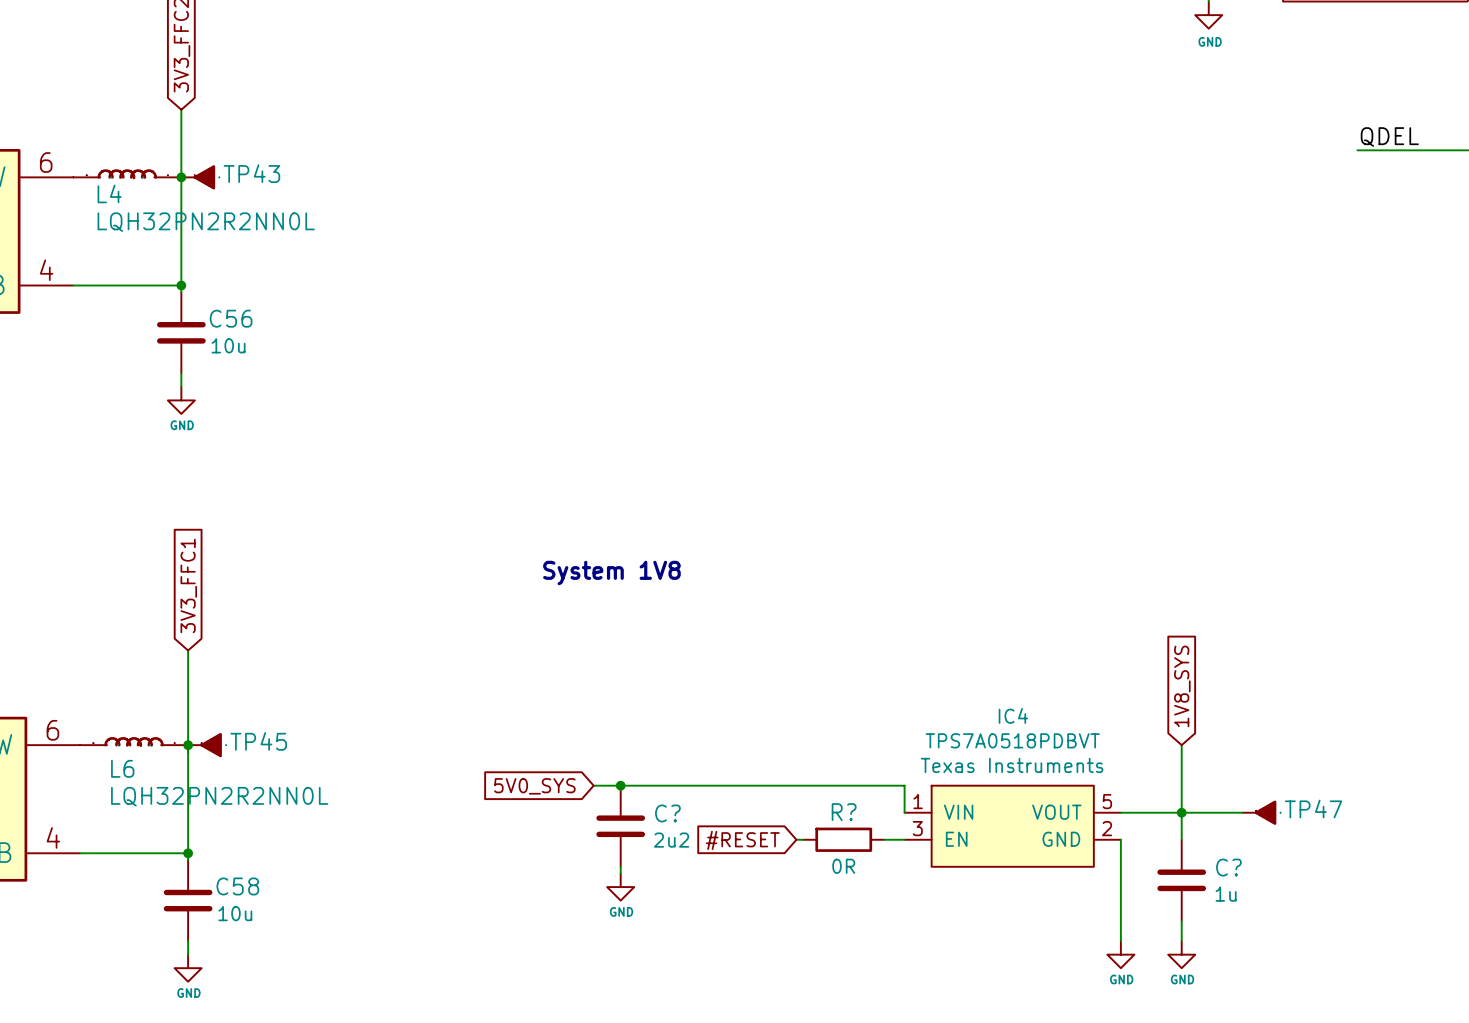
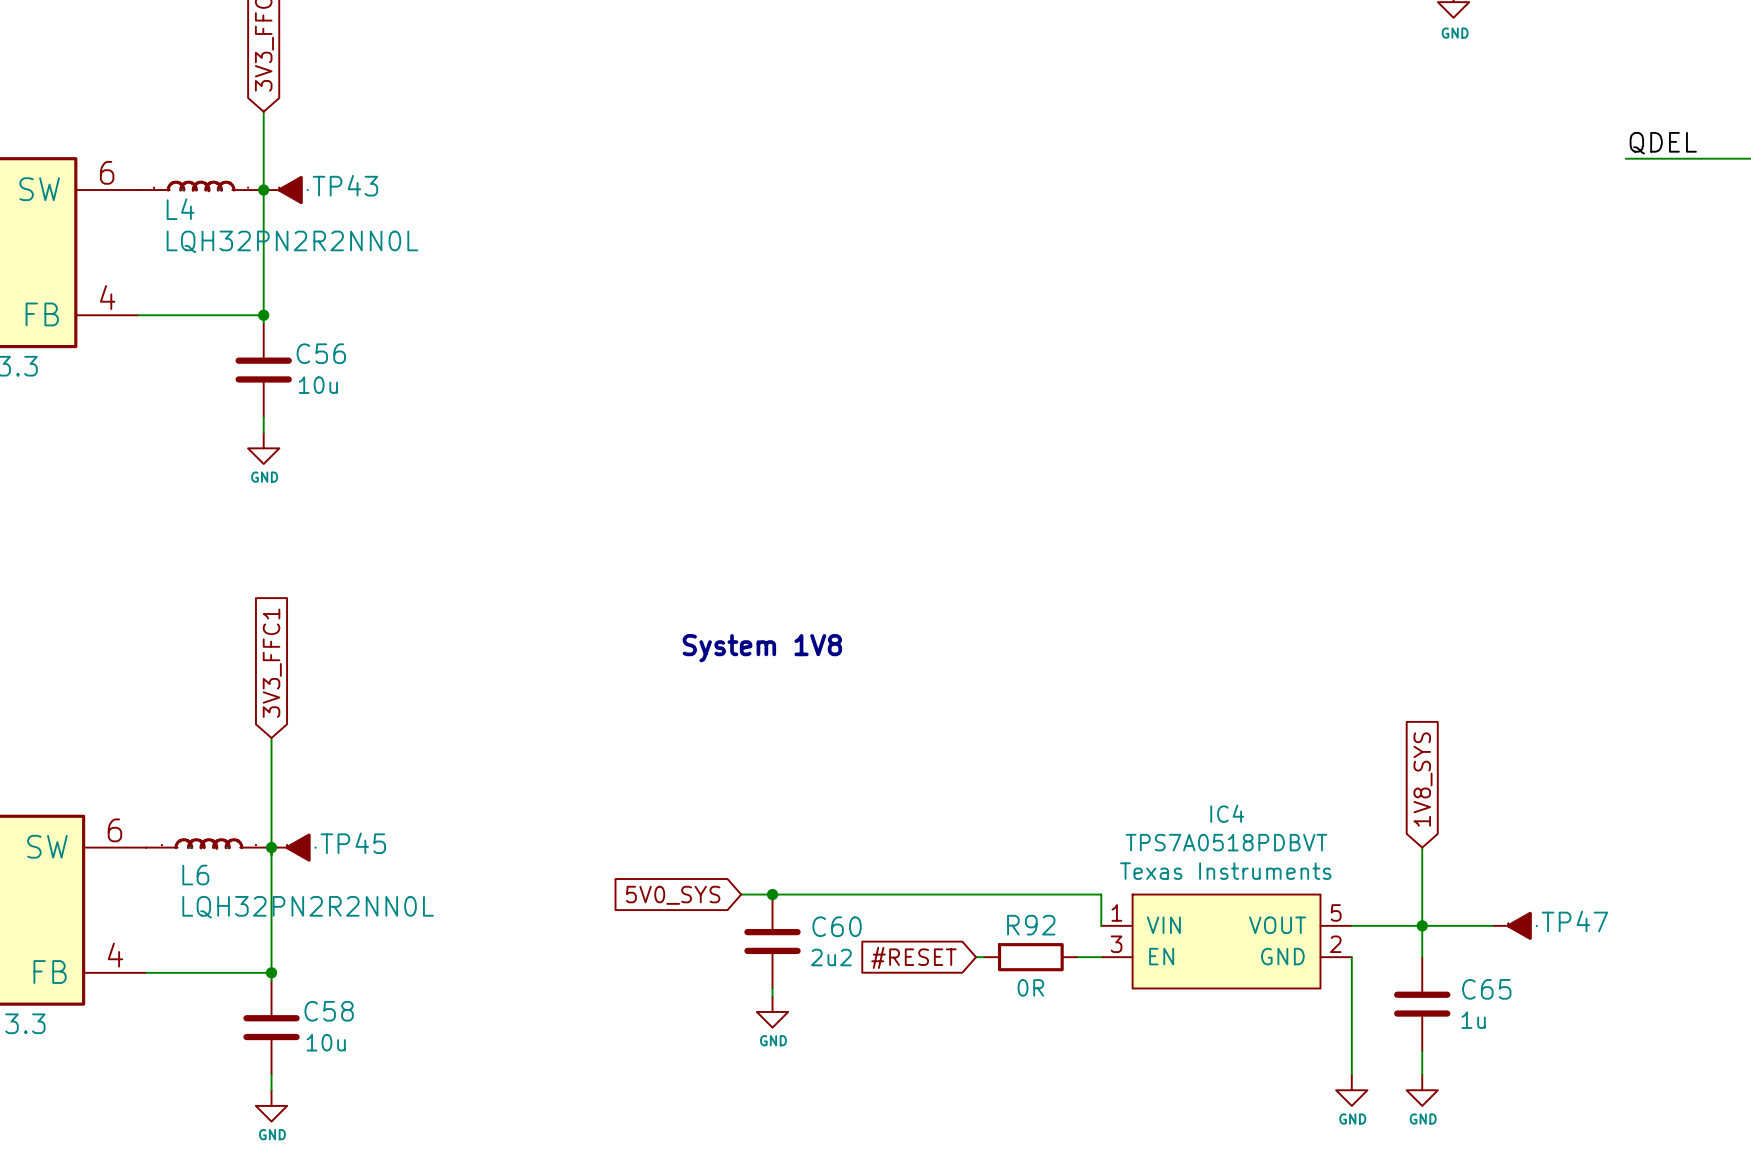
R? name: R? (844, 812) -> R92 (1031, 925)
C? name: C? (667, 813) -> C60 (837, 926)
C? name: C? (1228, 867) -> C65 (1486, 989)

